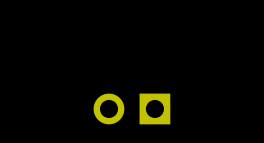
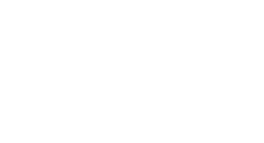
part: (131, 108) -> none

